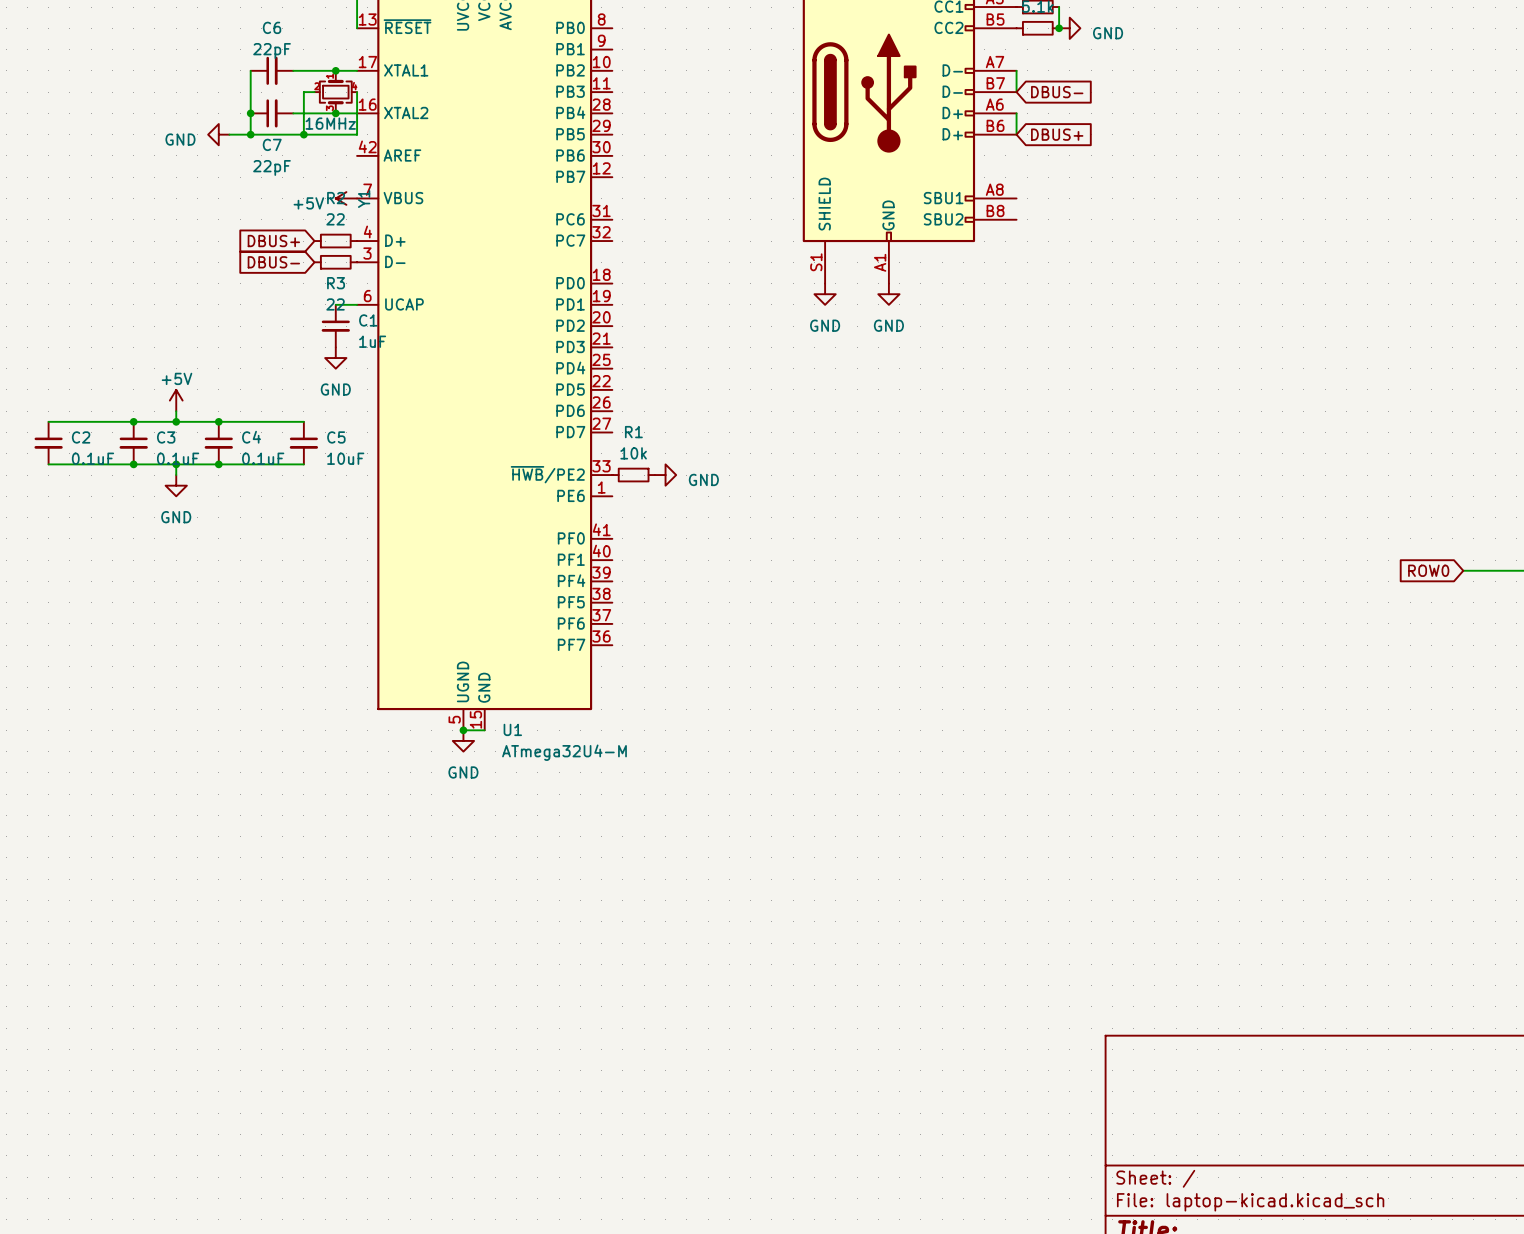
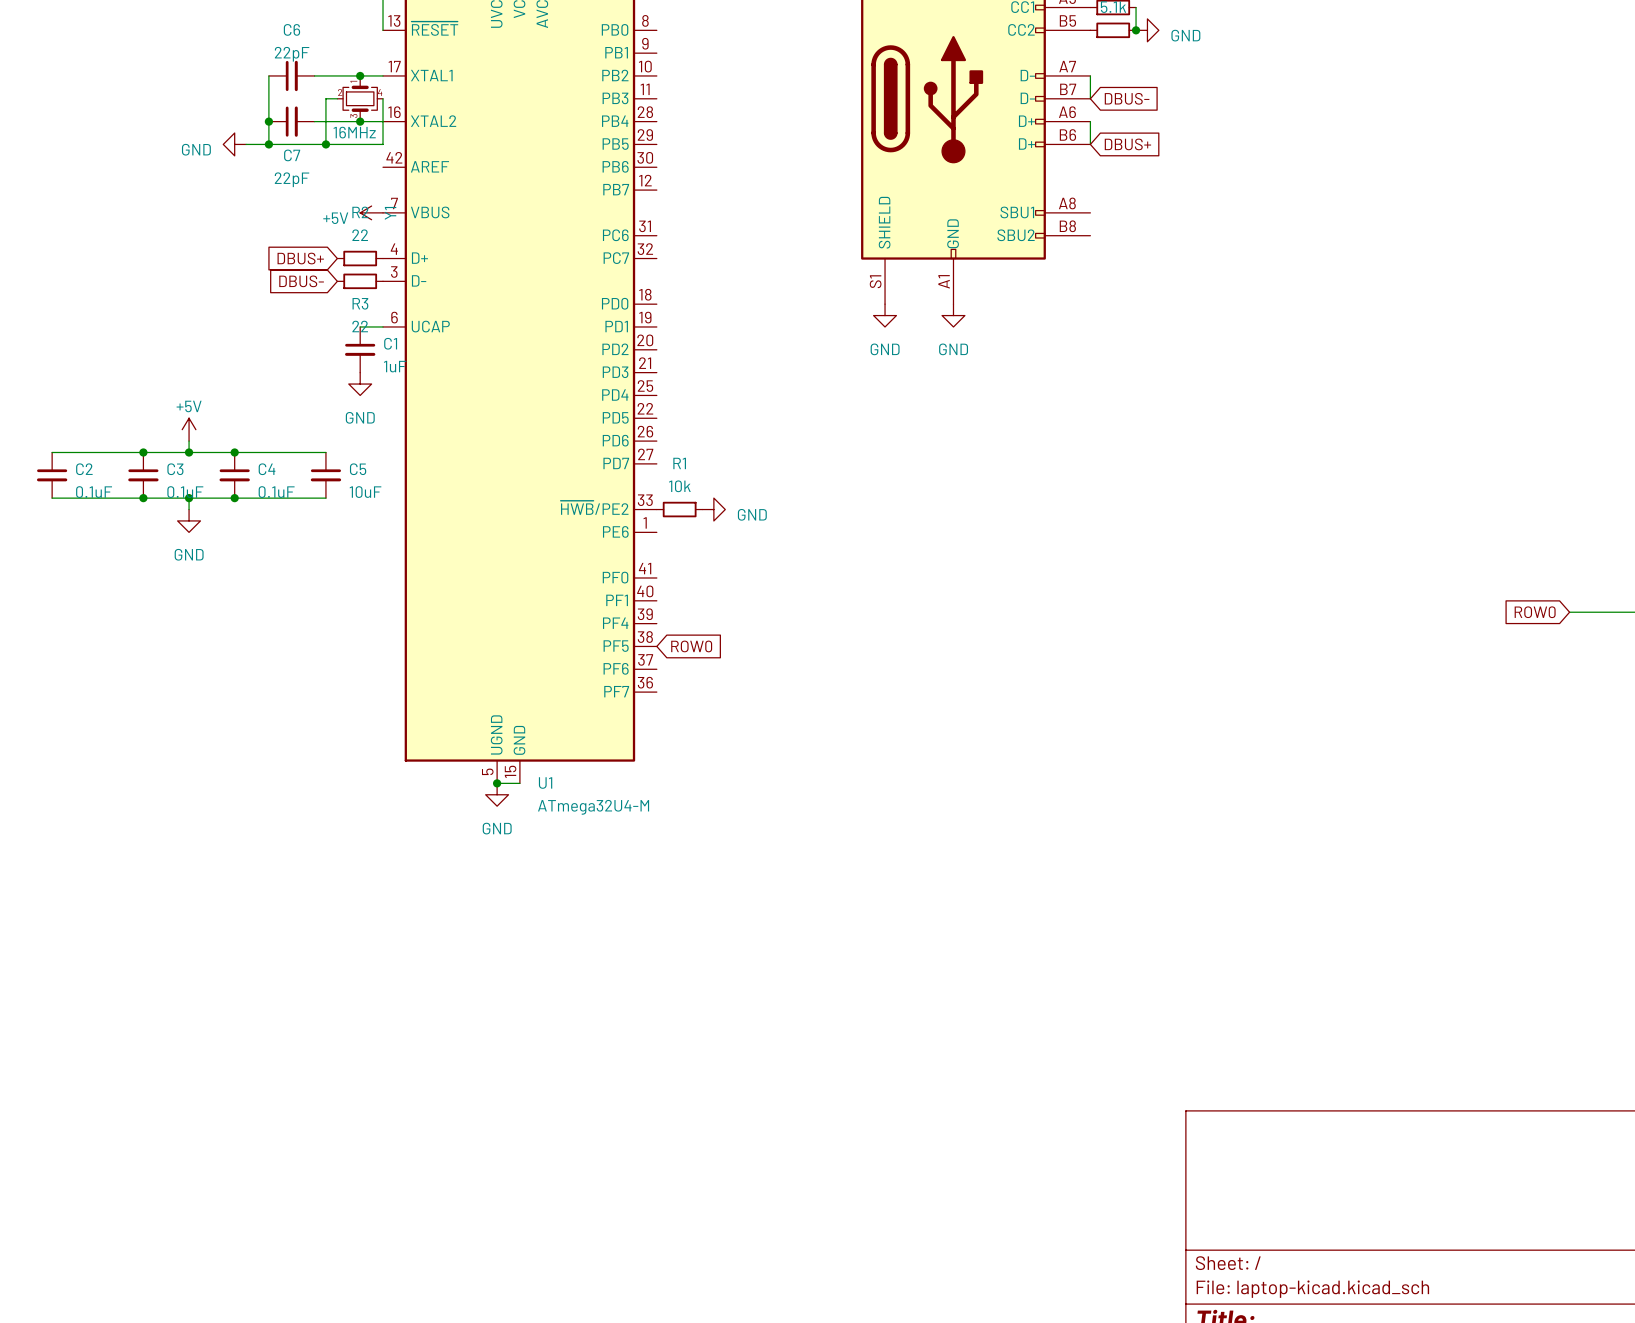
global label: none -> ROW0 (691, 646)

